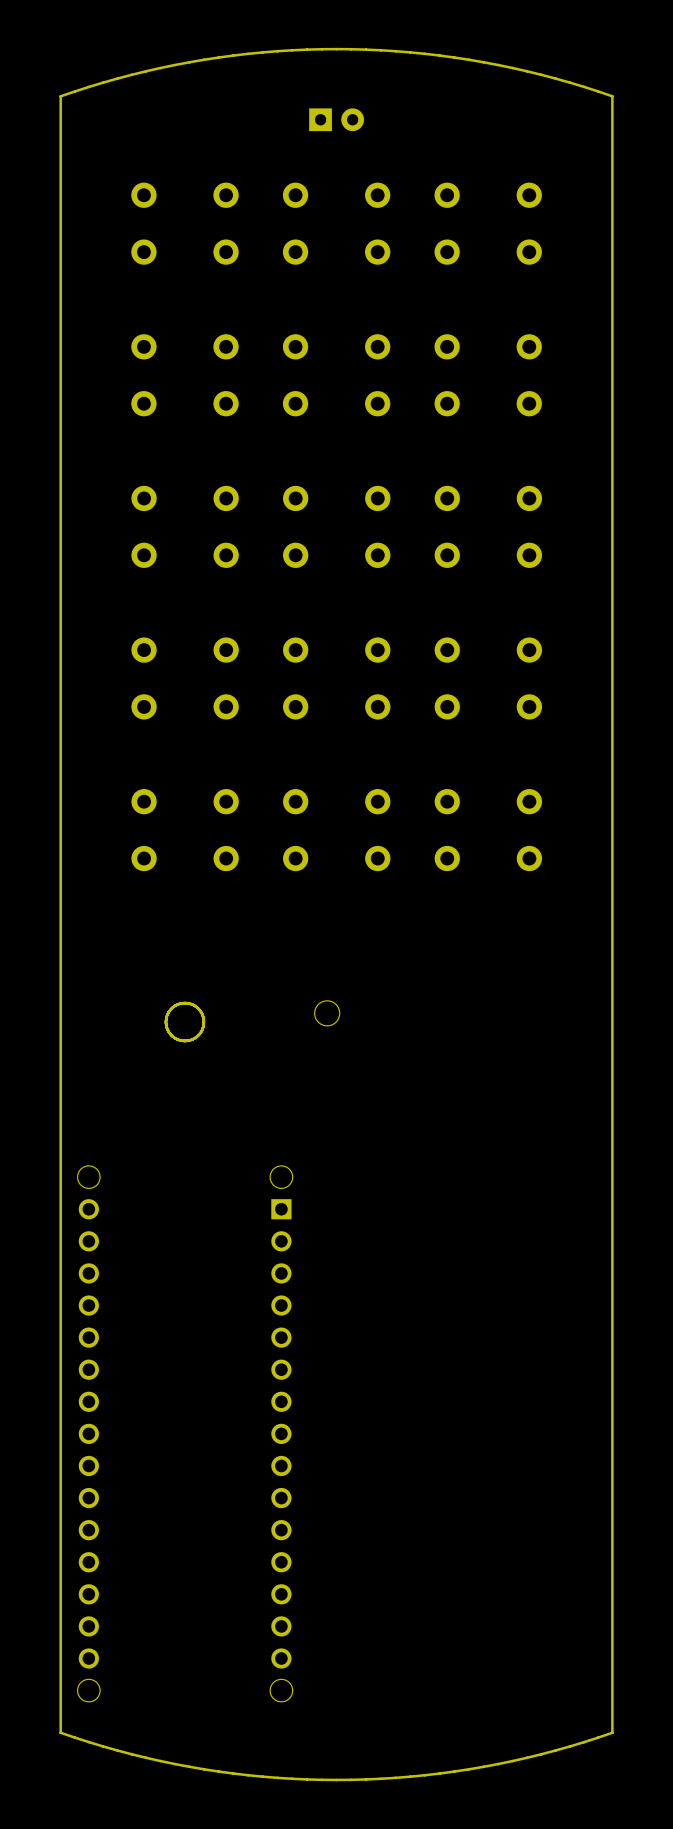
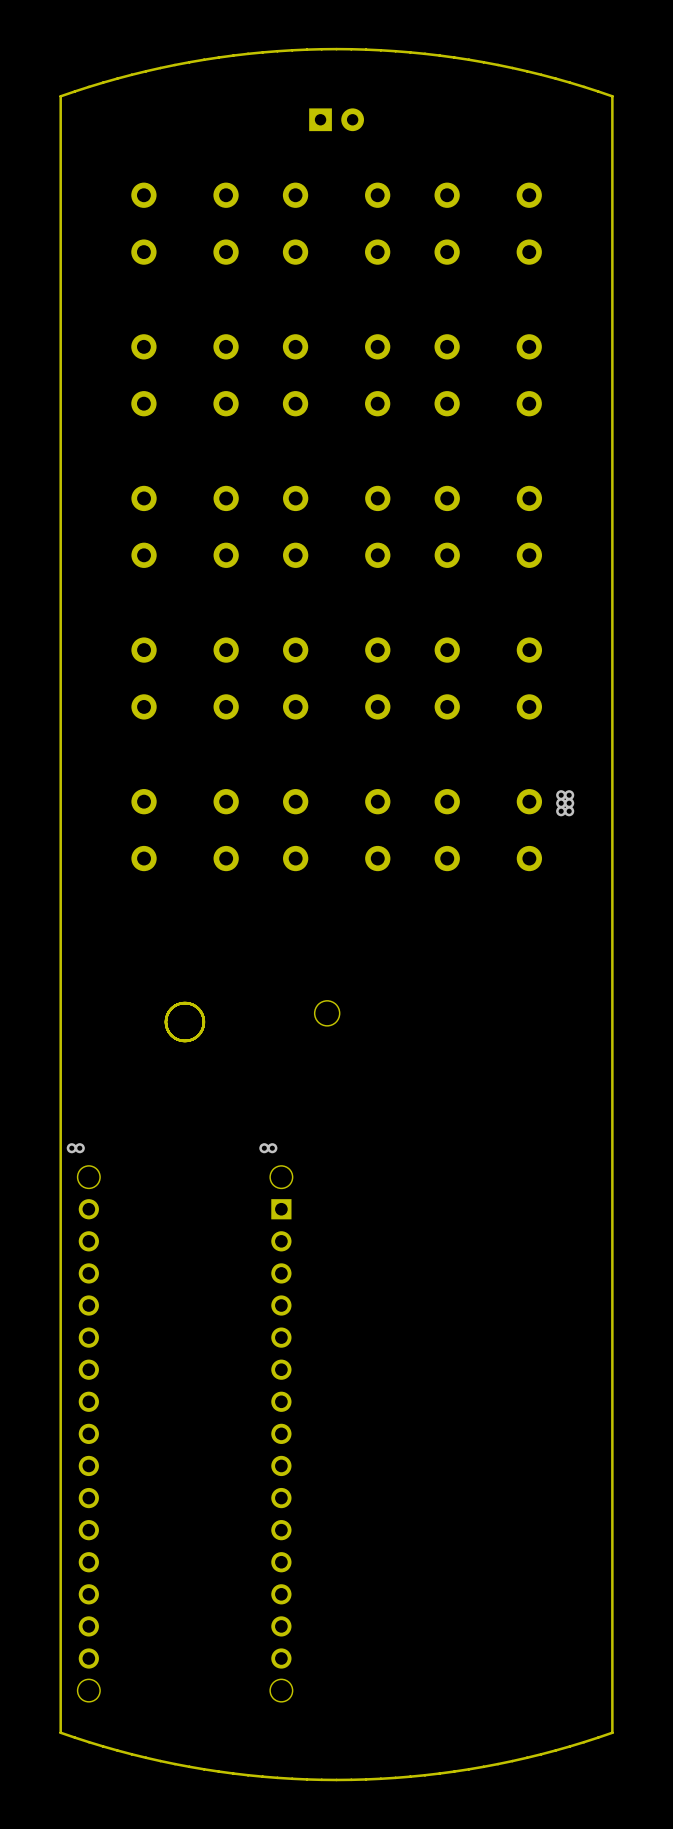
via: none -> (561, 795)
via: none -> (569, 795)
via: none -> (561, 803)
via: none -> (569, 803)
via: none -> (561, 811)
via: none -> (569, 811)
via: none -> (71, 1148)
via: none -> (79, 1148)
via: none -> (264, 1148)
via: none -> (272, 1148)

